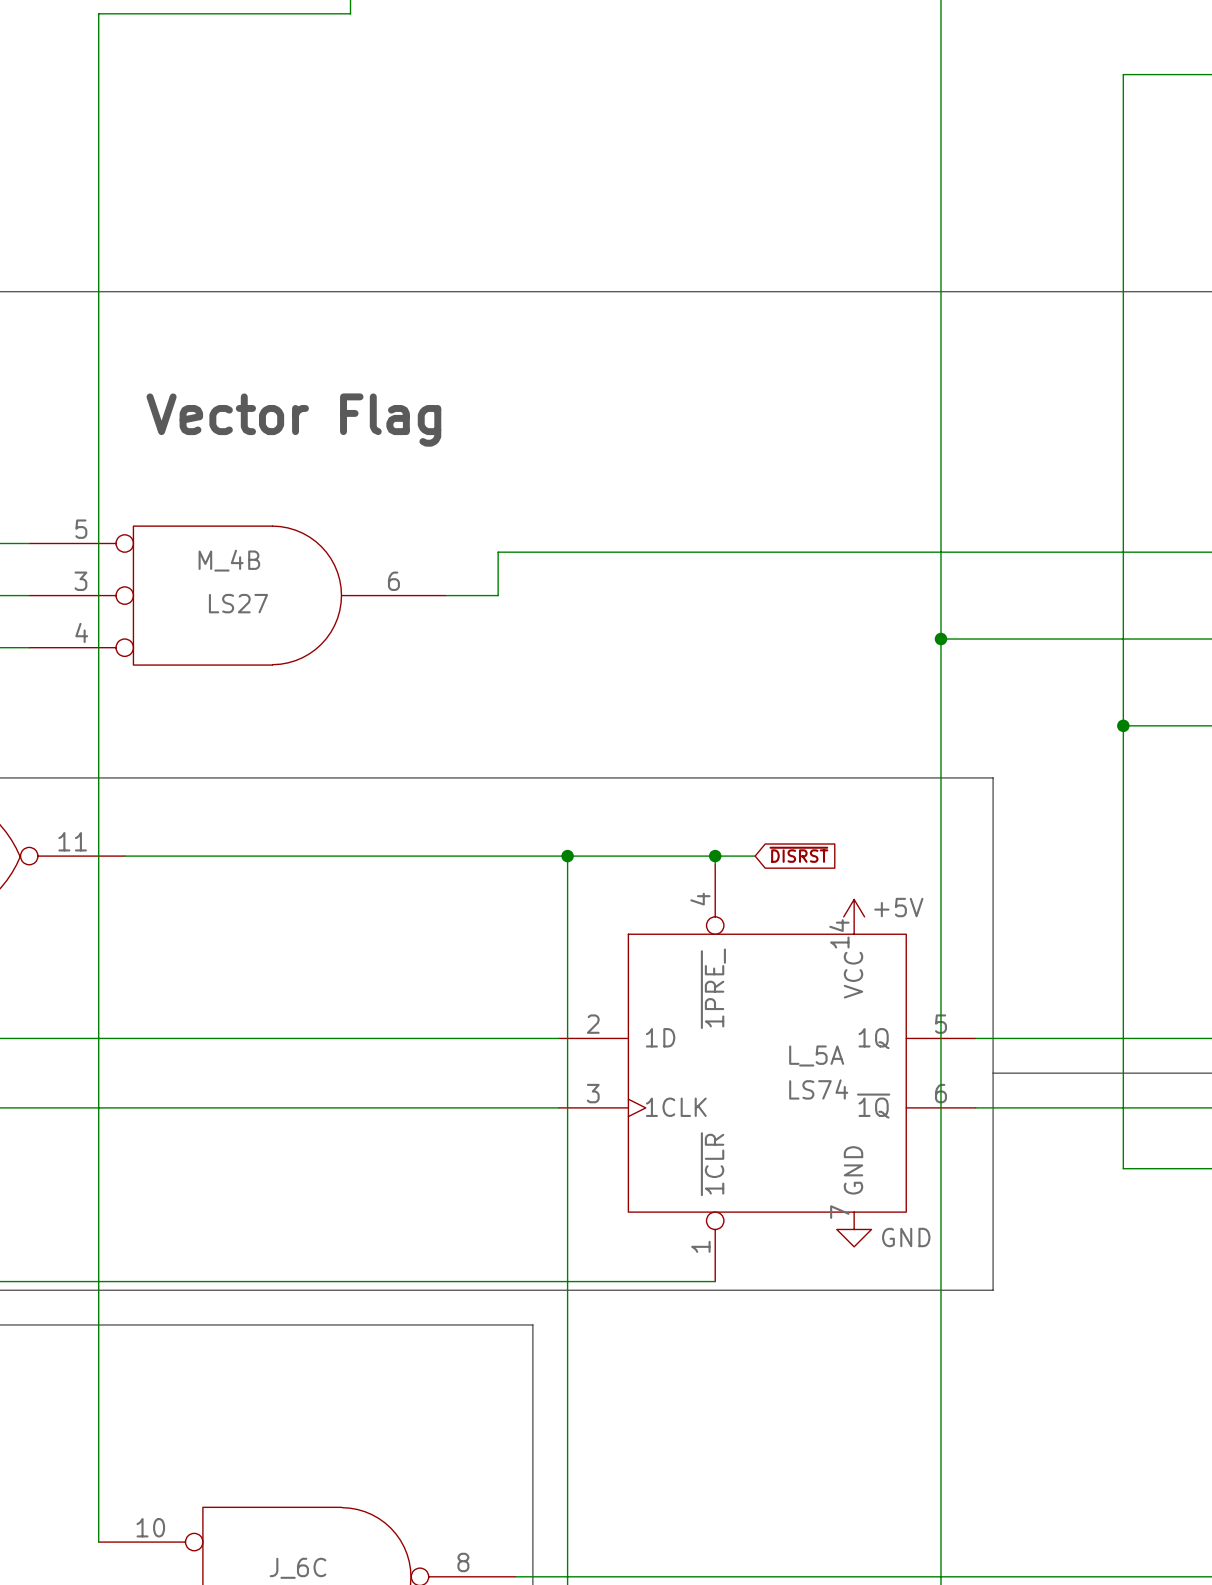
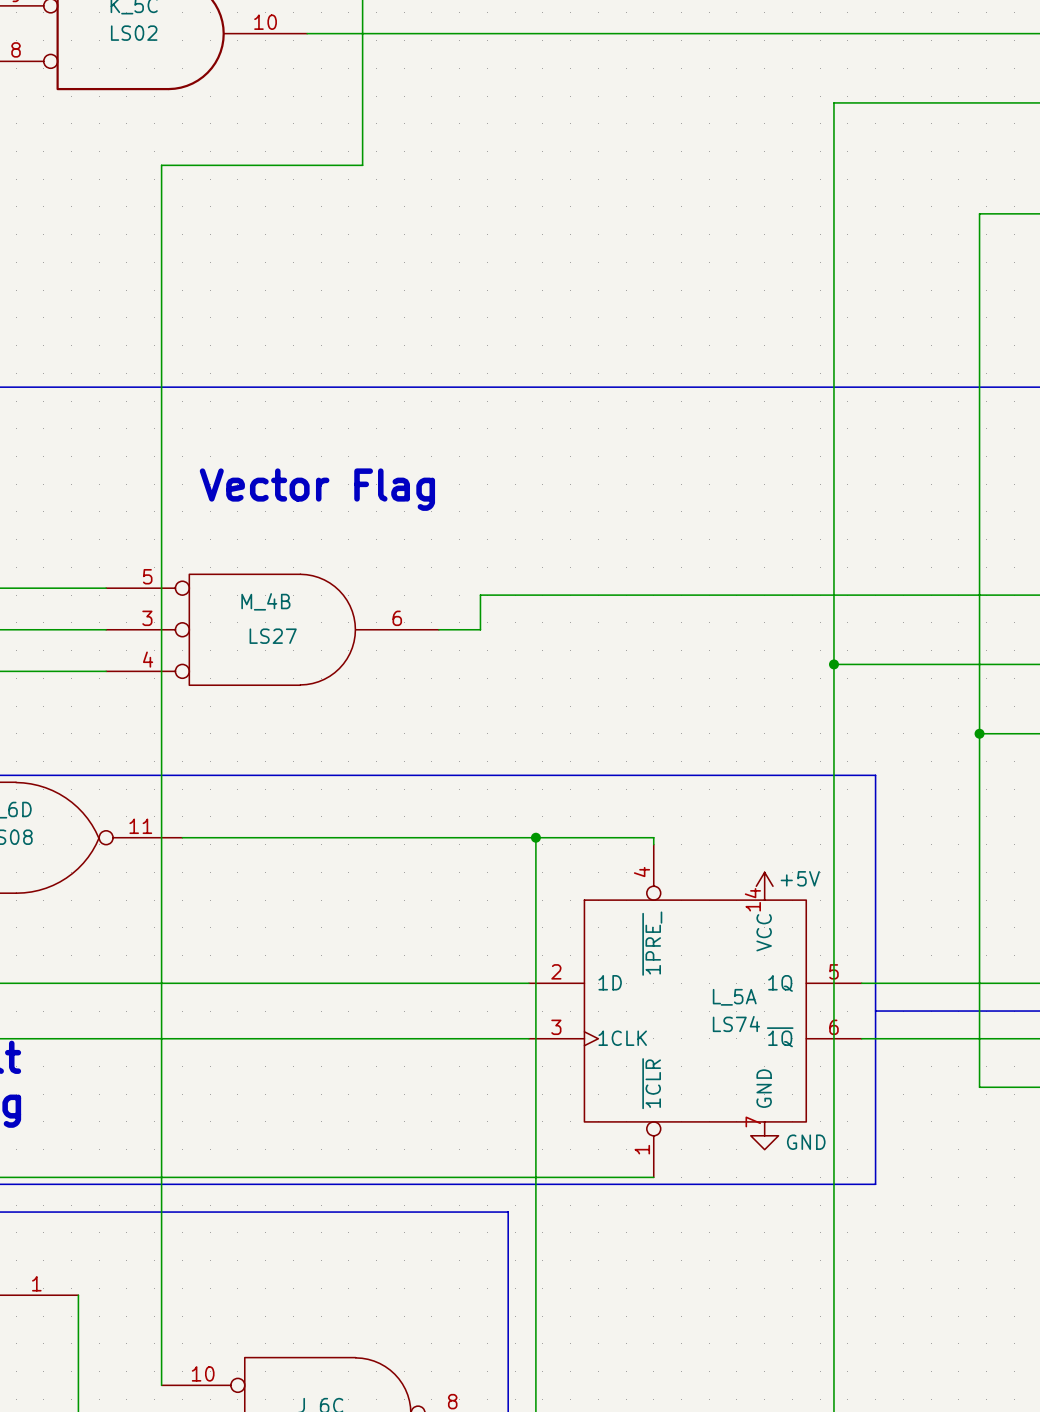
global label: ~{DISRST} (798, 854) -> none
wire: (715, 856) (755, 856) -> none
junction: (715, 856) -> none

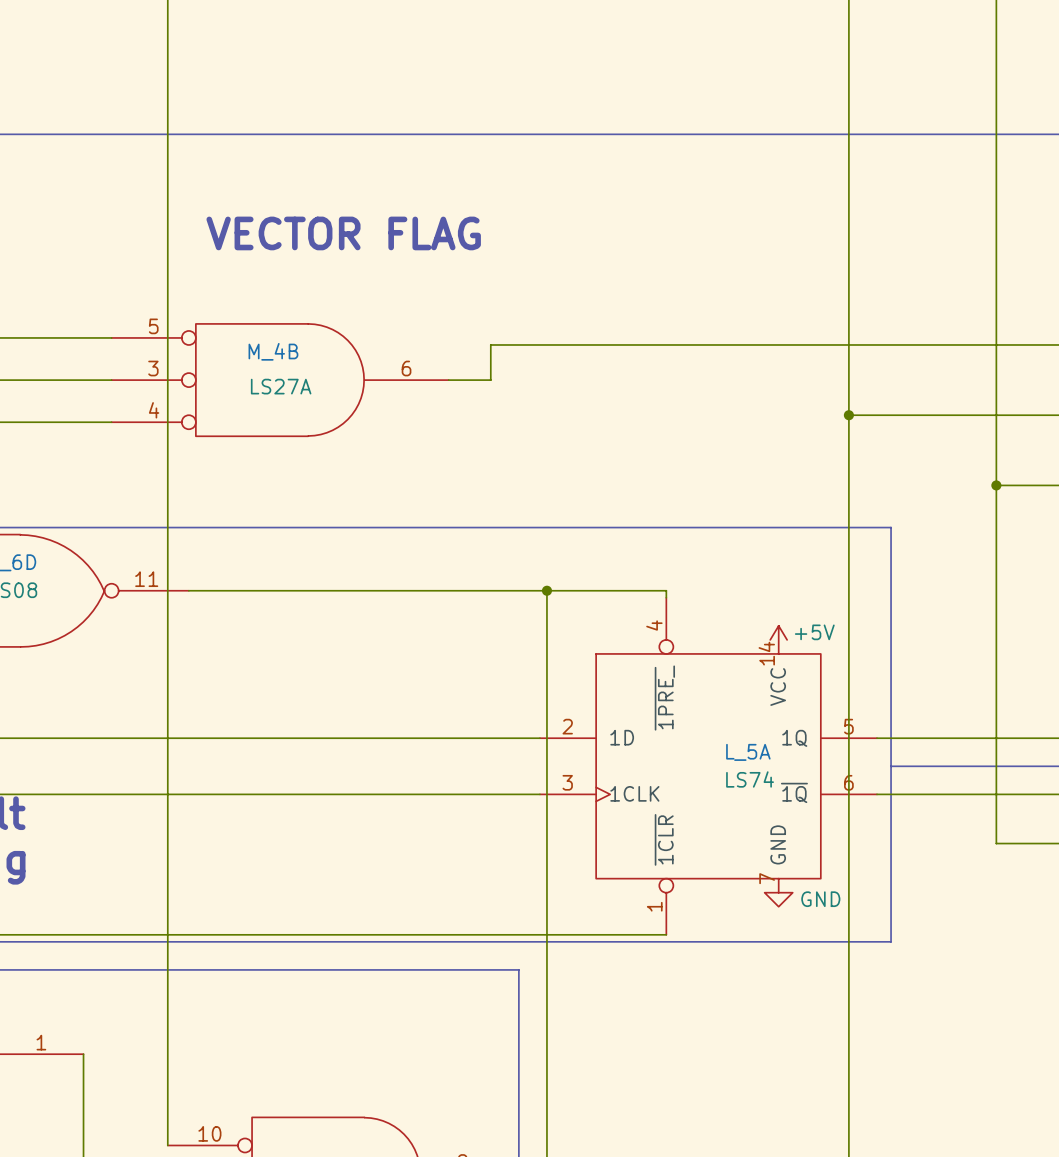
text: Vector Flag (317, 489) -> VECTOR FLAG (343, 233)
M_4B value: LS27 (273, 636) -> LS27A (281, 386)

